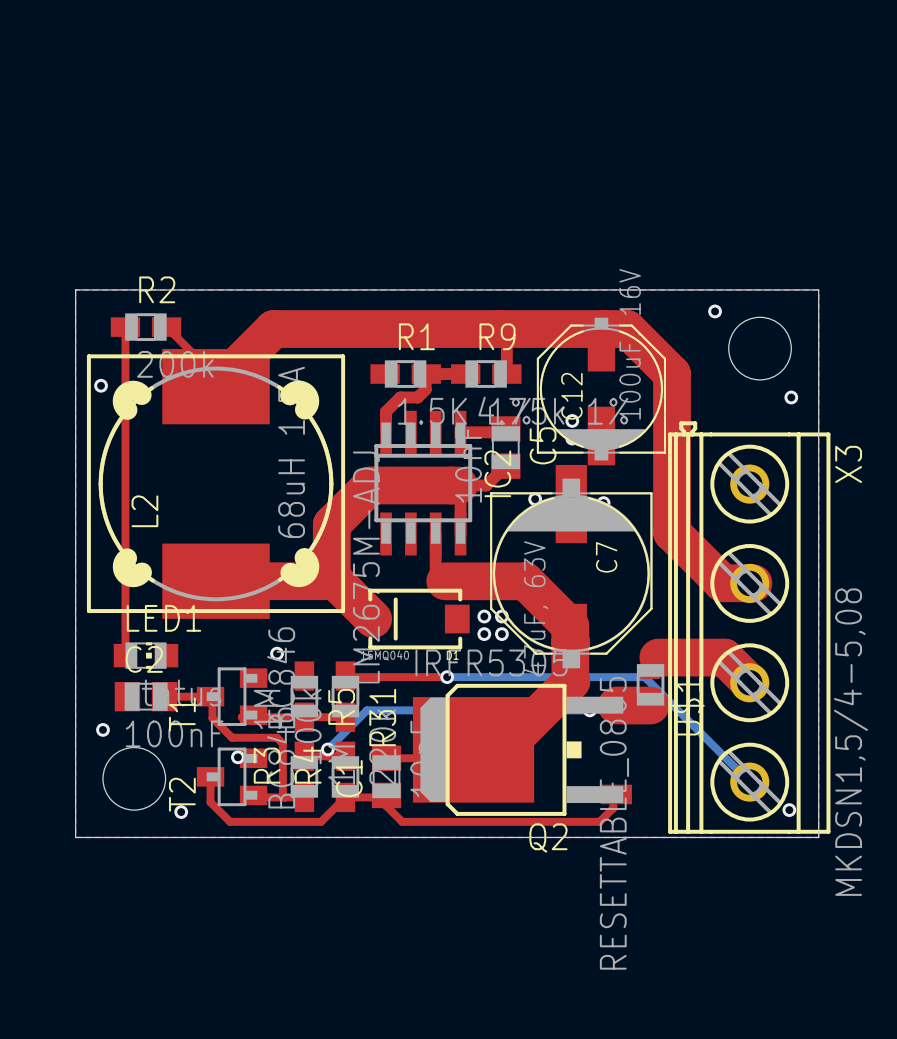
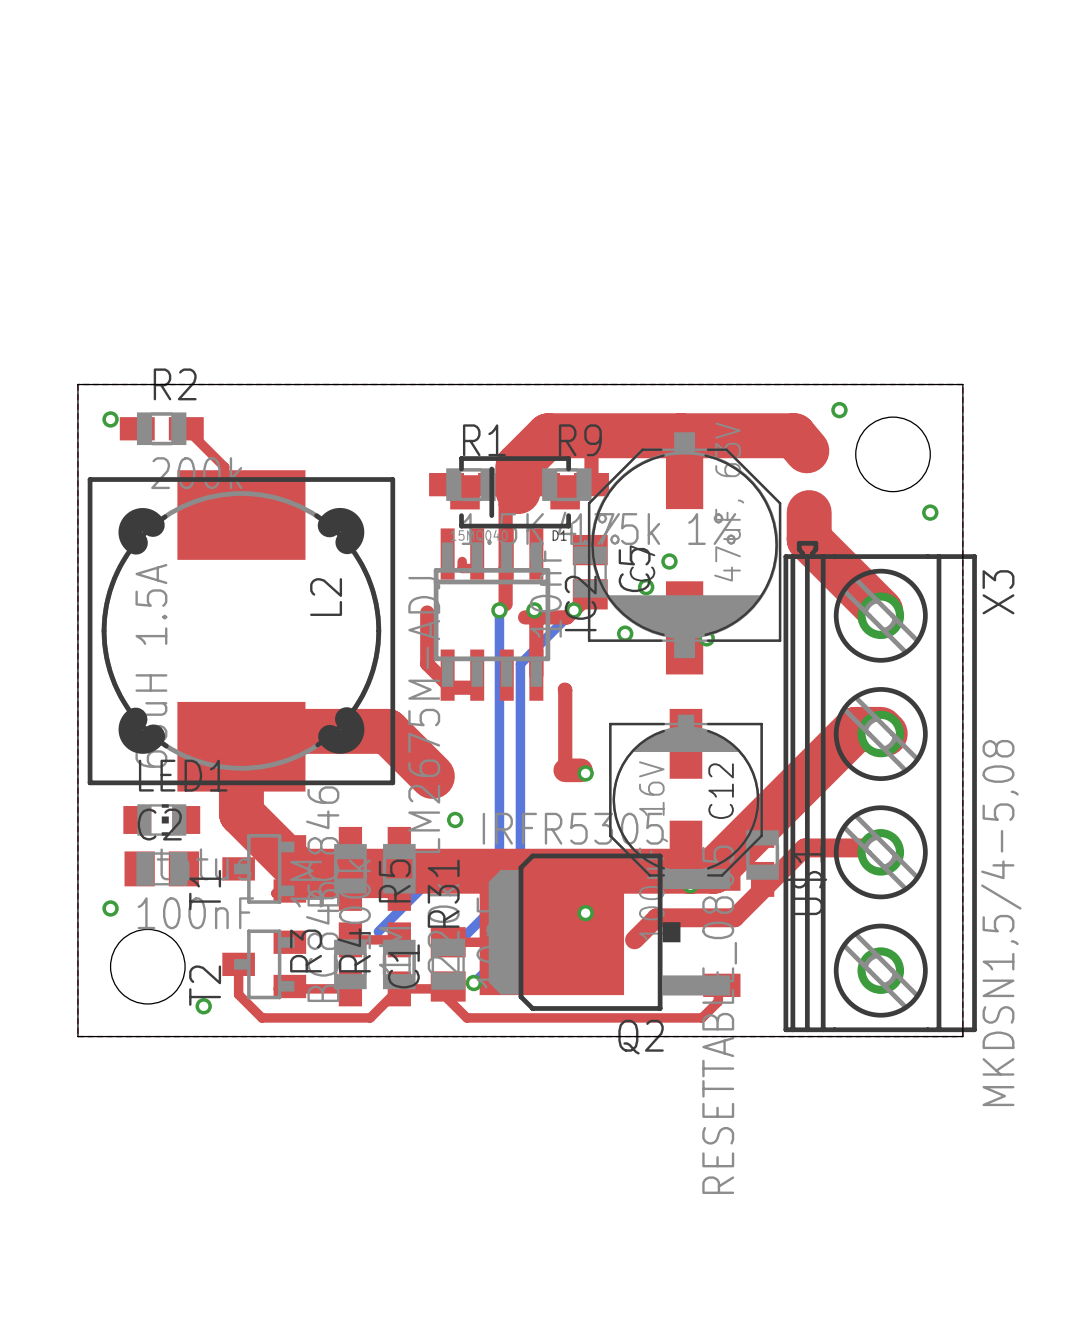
top track: (125, 327) (125, 655) -> none
top track: none -> (806, 450) (794, 435) (548, 435) (518, 466) (518, 491) (505, 504) (505, 604)
top track: (465, 374) (426, 374) (425, 389) (417, 397) (400, 397) (386, 411) (386, 432) -> none
top track: (195, 377) (204, 385) (216, 386) (273, 329) (627, 329) (672, 374) (672, 532) (722, 583) (749, 583) -> none
via position: (101, 385) -> (110, 419)
top track: none -> (806, 499) (809, 512) (809, 539) (880, 611)
C12 rotation: 0° (601, 389) -> 180° (685, 799)
C12 position: (601, 389) -> (685, 799)
via: (572, 420) -> none
top track: (505, 428) (502, 432) (460, 432) -> none
top track: none -> (462, 561) (462, 568) (476, 568)
via: none -> (646, 587)
bottom track: none -> (499, 610) (499, 901) (462, 938)
via: none -> (499, 610)
via: none -> (534, 610)
bottom track: none -> (573, 610) (520, 663) (520, 936) (473, 983)
via: none -> (573, 610)
top track: none -> (427, 612) (427, 663) (451, 687) (474, 687) (476, 689)
L2 rotation: 0° (216, 483) -> 180° (241, 630)
top track: (458, 485) (370, 485) (331, 524) (331, 581) -> none
top track: (435, 533) (435, 571) (445, 581) (525, 581) (570, 626) (571, 681) (497, 754) (497, 769) -> none
top track: none -> (564, 689) (565, 770) (580, 770)
C7 rotation: 0° (571, 573) -> 180° (684, 545)
C7 position: (571, 573) -> (684, 545)
top track: none -> (880, 729) (855, 729) (713, 871) (299, 871) (241, 813) (241, 746)
via: (484, 616) -> none
D1 position: (415, 619) -> (515, 492)
via: (484, 634) -> none
via: (501, 634) -> none
via: (277, 653) -> none
via: none -> (455, 819)
top track: (650, 664) (658, 657) (724, 657) (749, 682) -> none
top track: (345, 676) (447, 677) -> none
bottom track: (447, 677) (644, 677) (749, 782) -> none
via: (447, 677) -> none
top track: none -> (880, 847) (804, 847) (734, 917) (656, 917) (634, 939)
top track: (164, 696) (210, 696) (212, 698) (212, 718) (232, 737) (277, 737) (282, 743) (282, 795) (284, 797) -> none
top track: (616, 705) (650, 705) -> none
via: none -> (585, 913)
via: (327, 749) -> none
via: (237, 757) -> none
via: none -> (473, 983)
via: (789, 810) -> none

